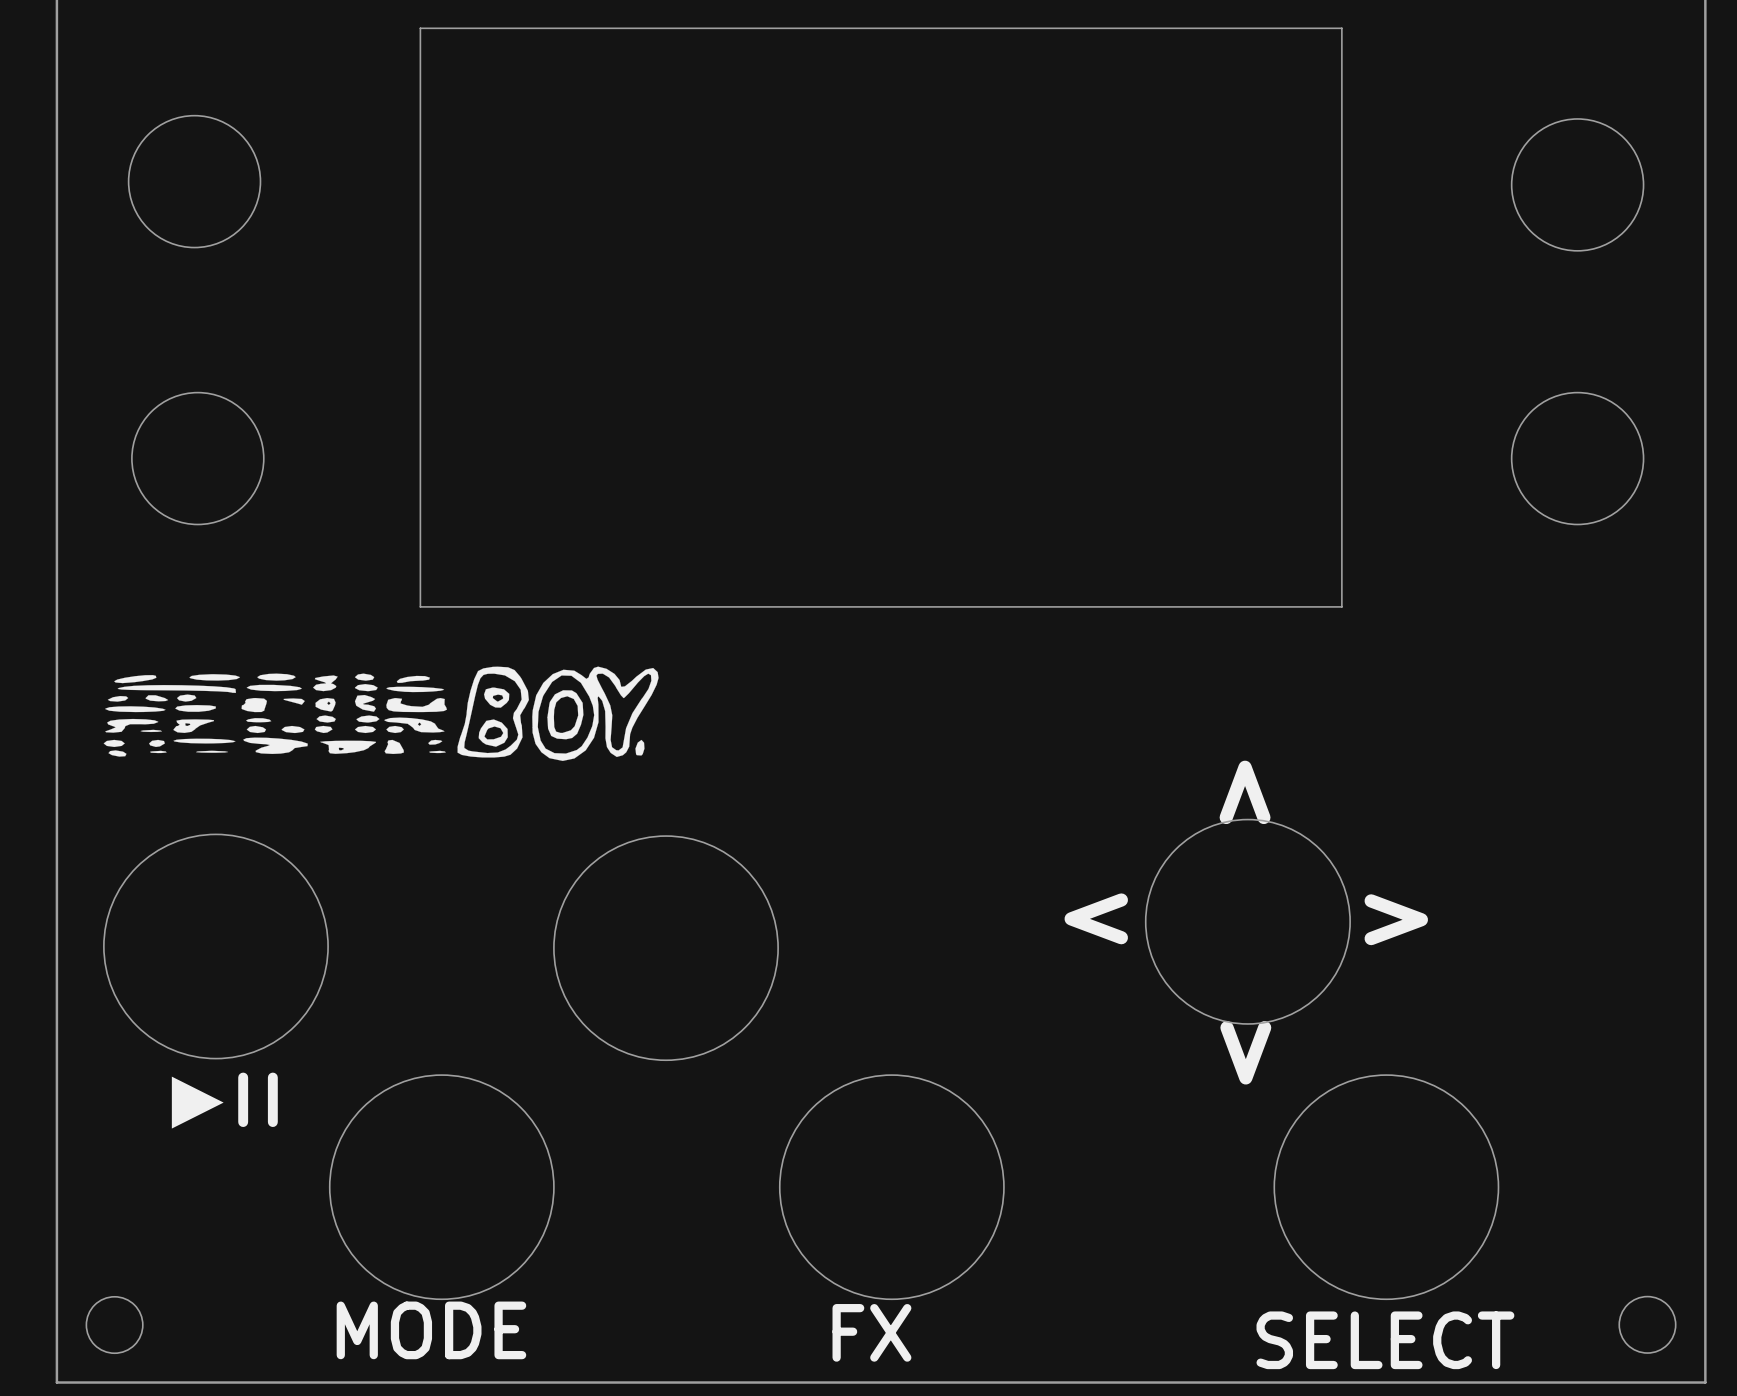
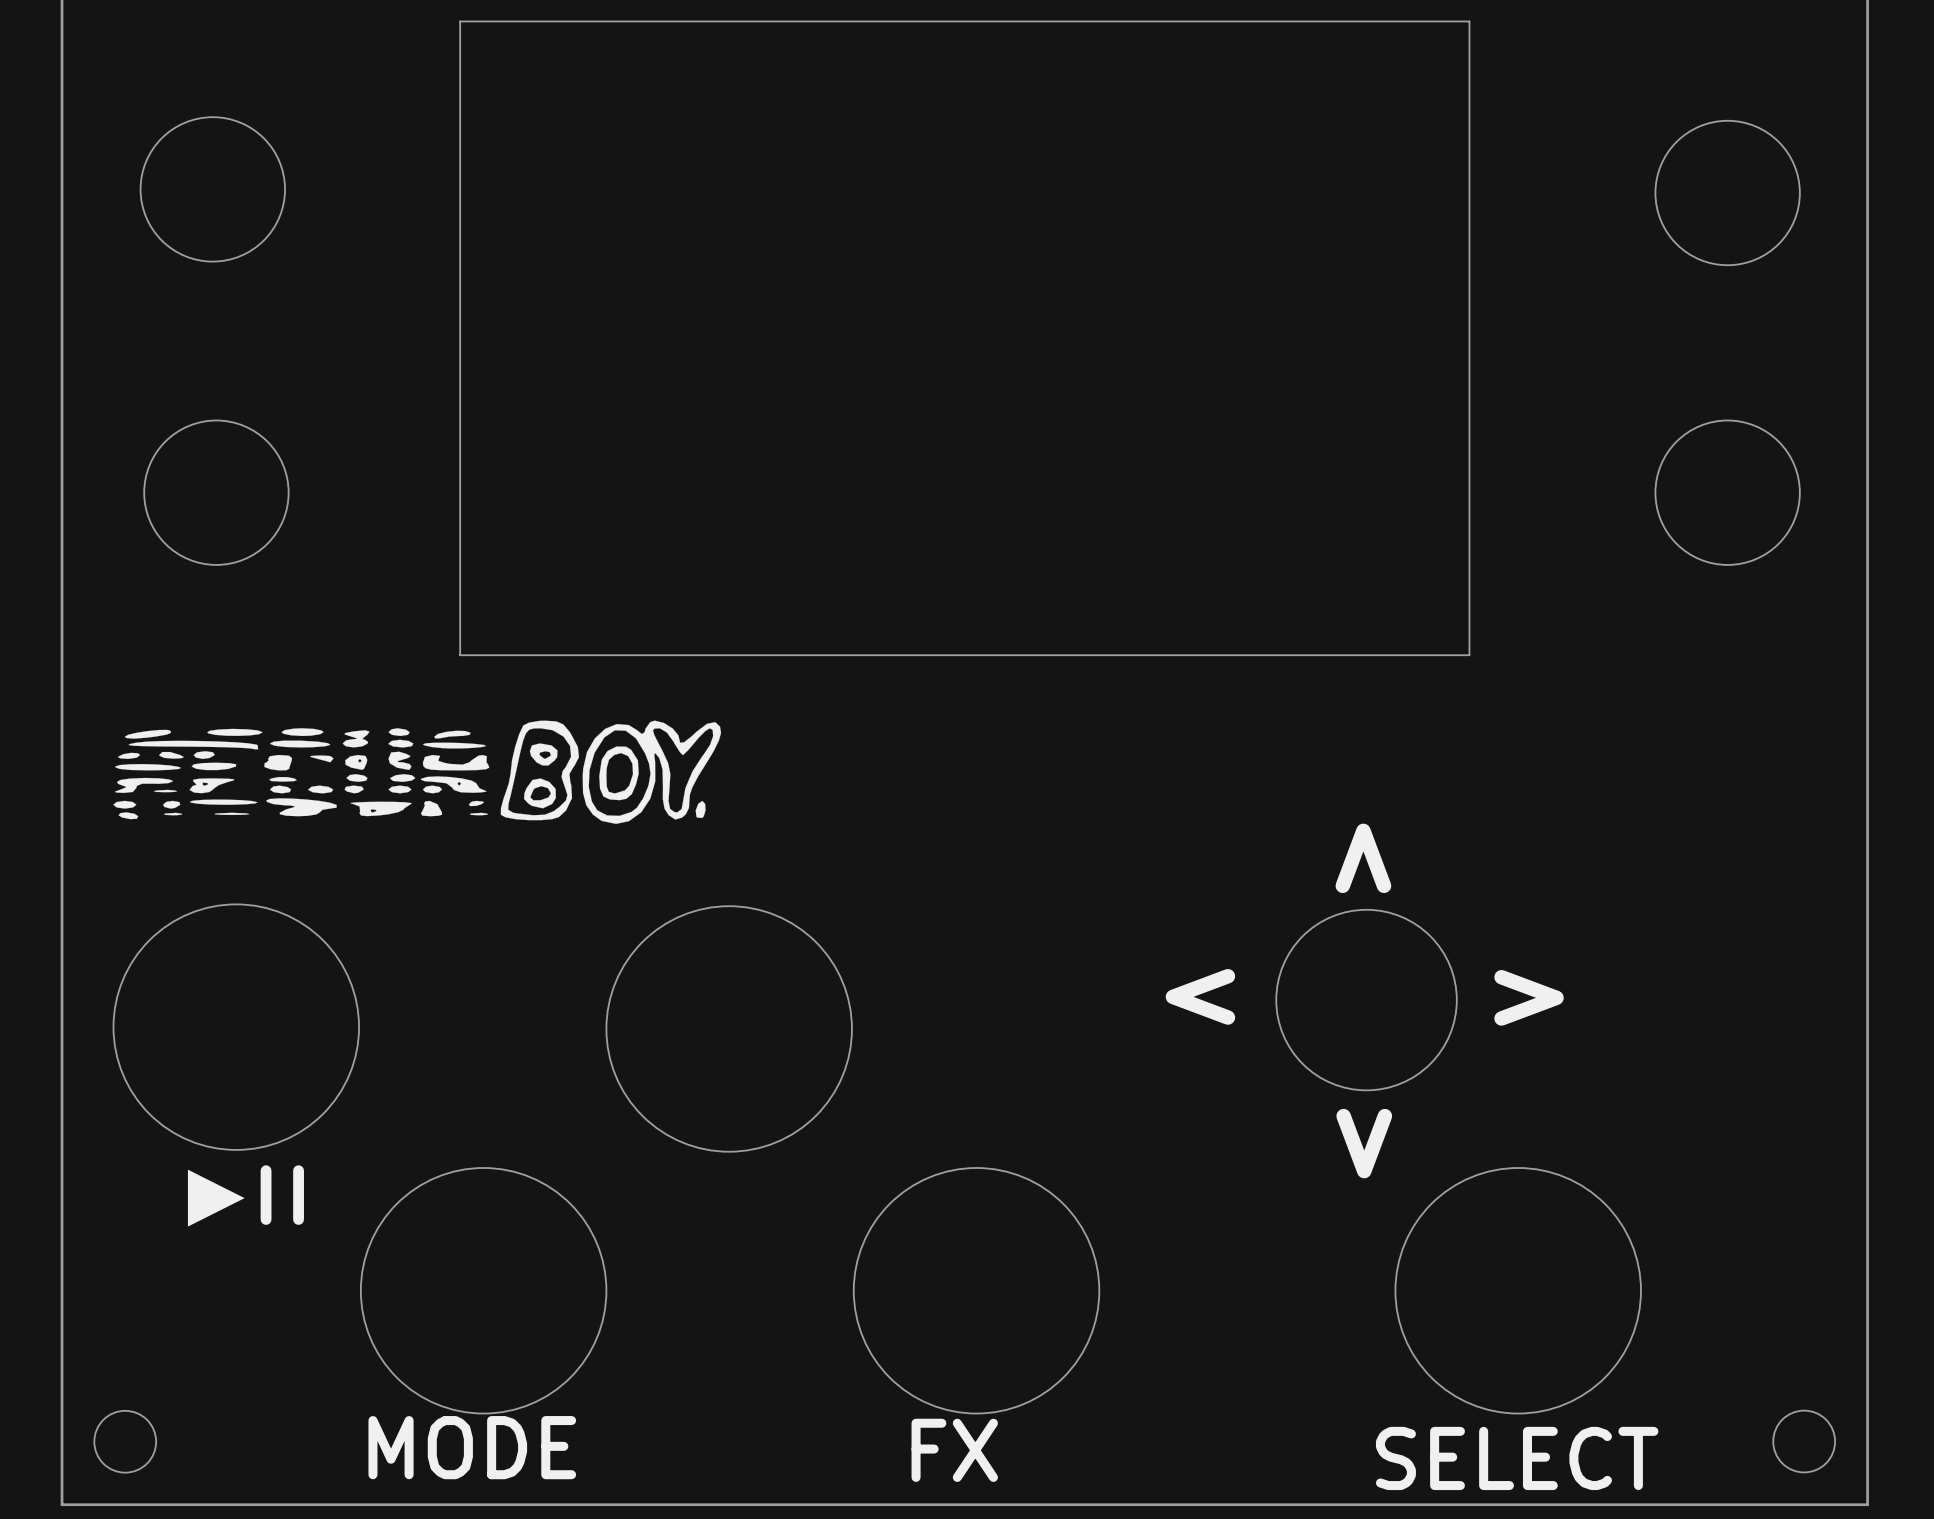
round board edge size: [1144, 818, 1351, 1025] -> [1275, 908, 1458, 1092]

